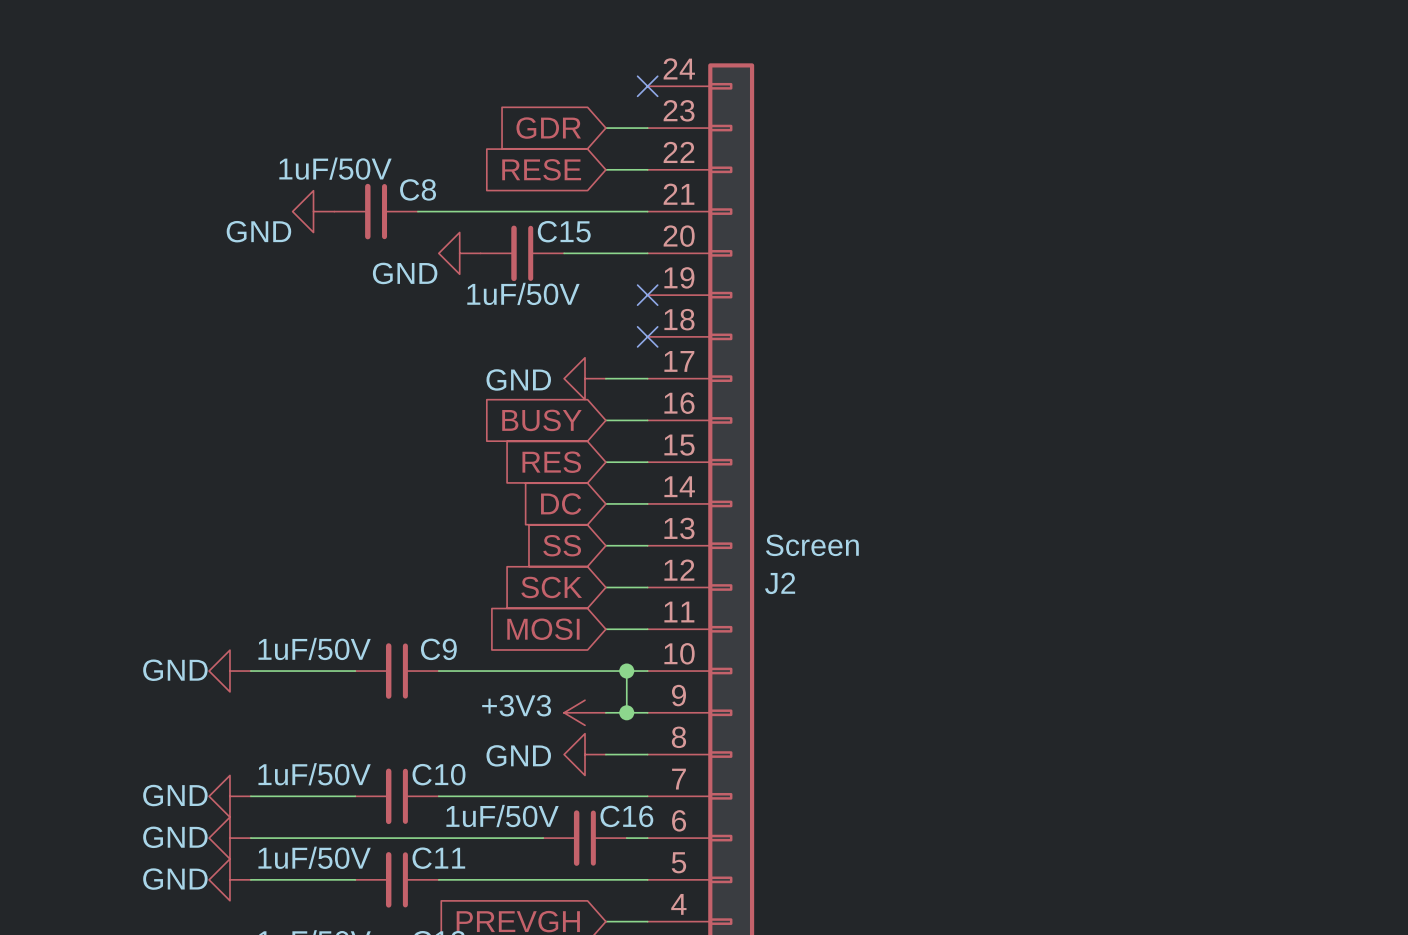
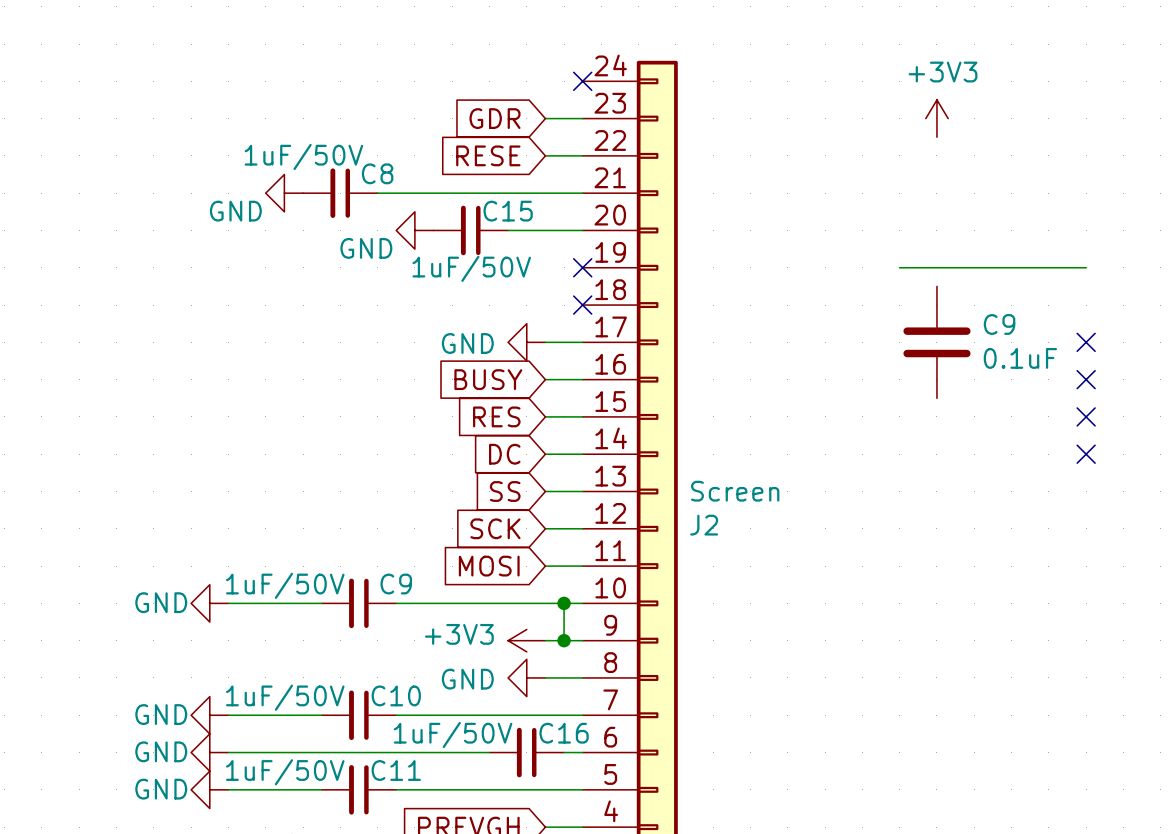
power symbol: none -> +3V3 (936, 118)
wire: none -> (899, 267) (1086, 267)
C9: none -> 0.1uF (936, 342)
no-connect mark: none -> (1086, 342)
no-connect mark: none -> (1086, 379)
no-connect mark: none -> (1086, 416)
no-connect mark: none -> (1086, 454)

